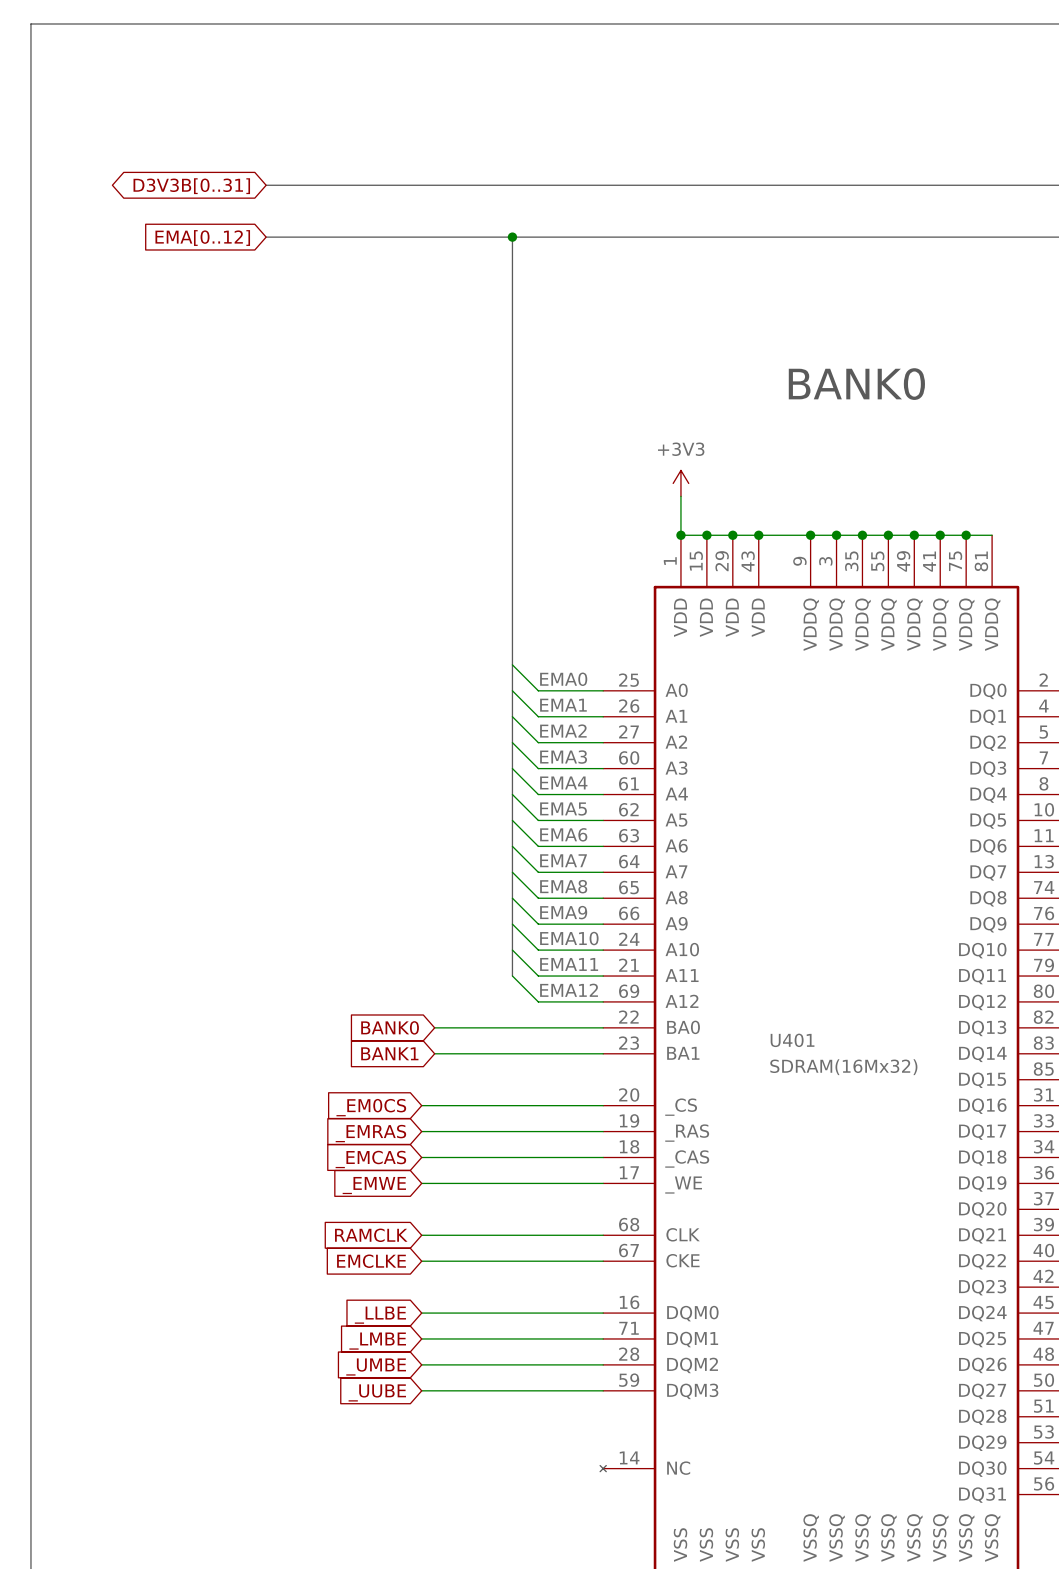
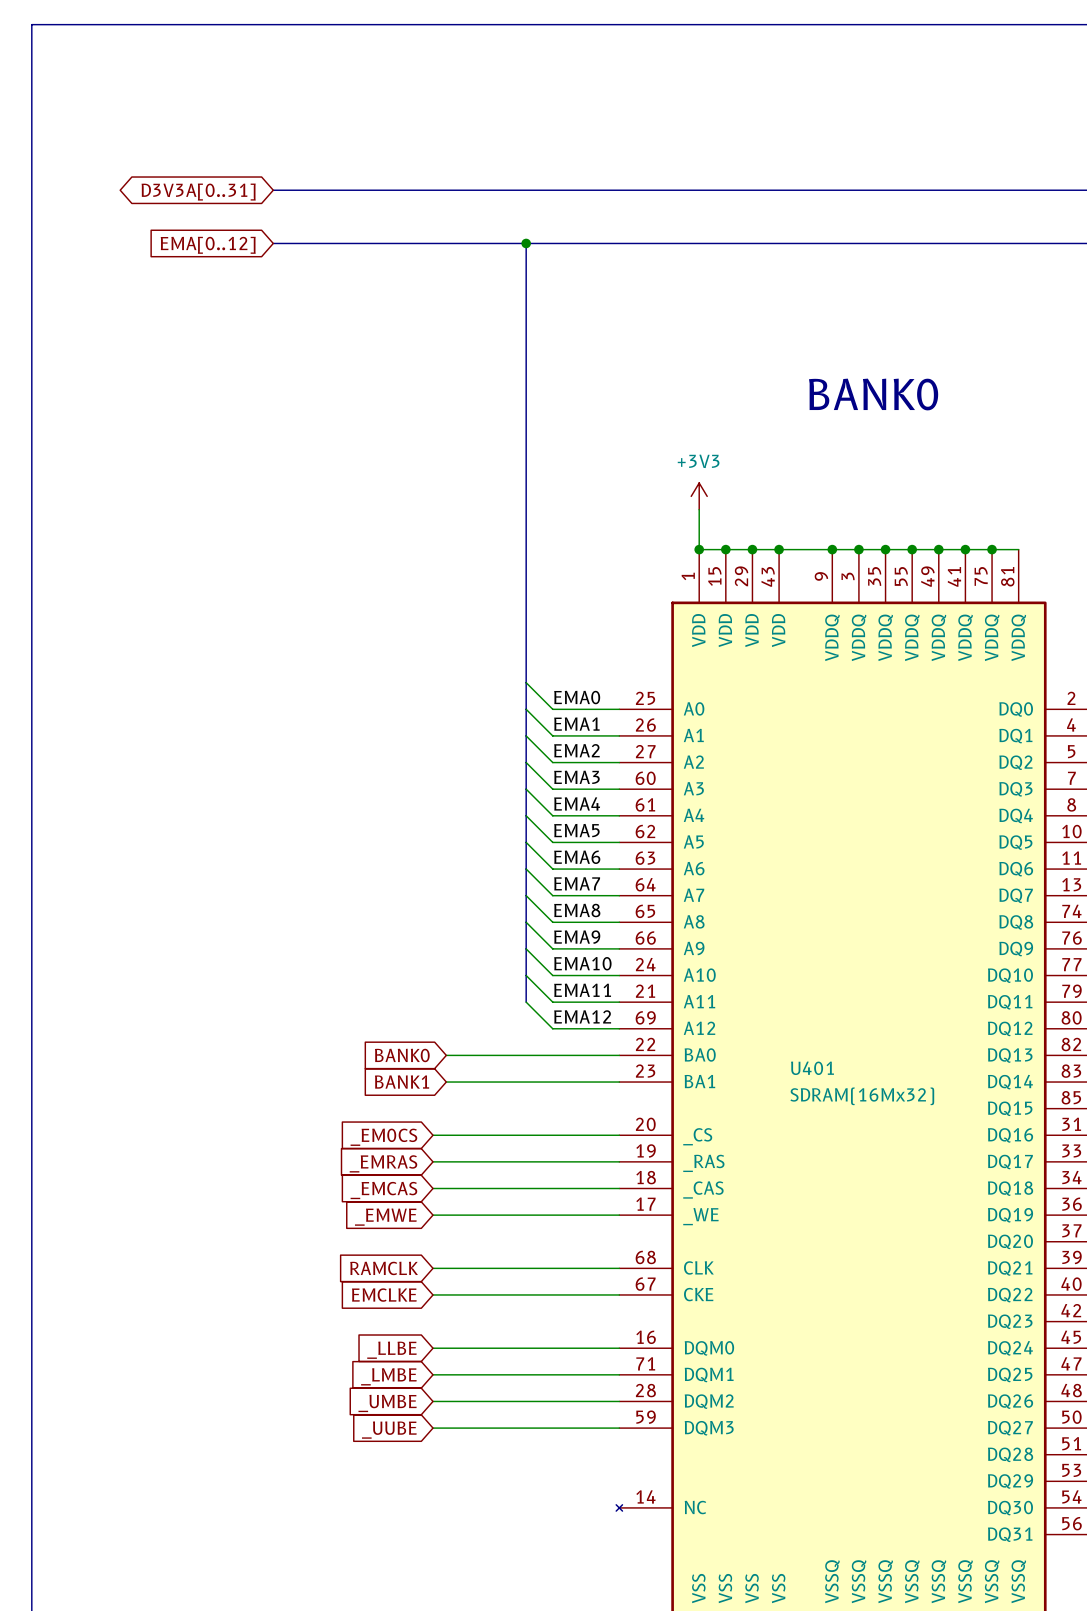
global label: D3V3B[0..31] (191, 186) -> D3V3A[0..31] (198, 192)

